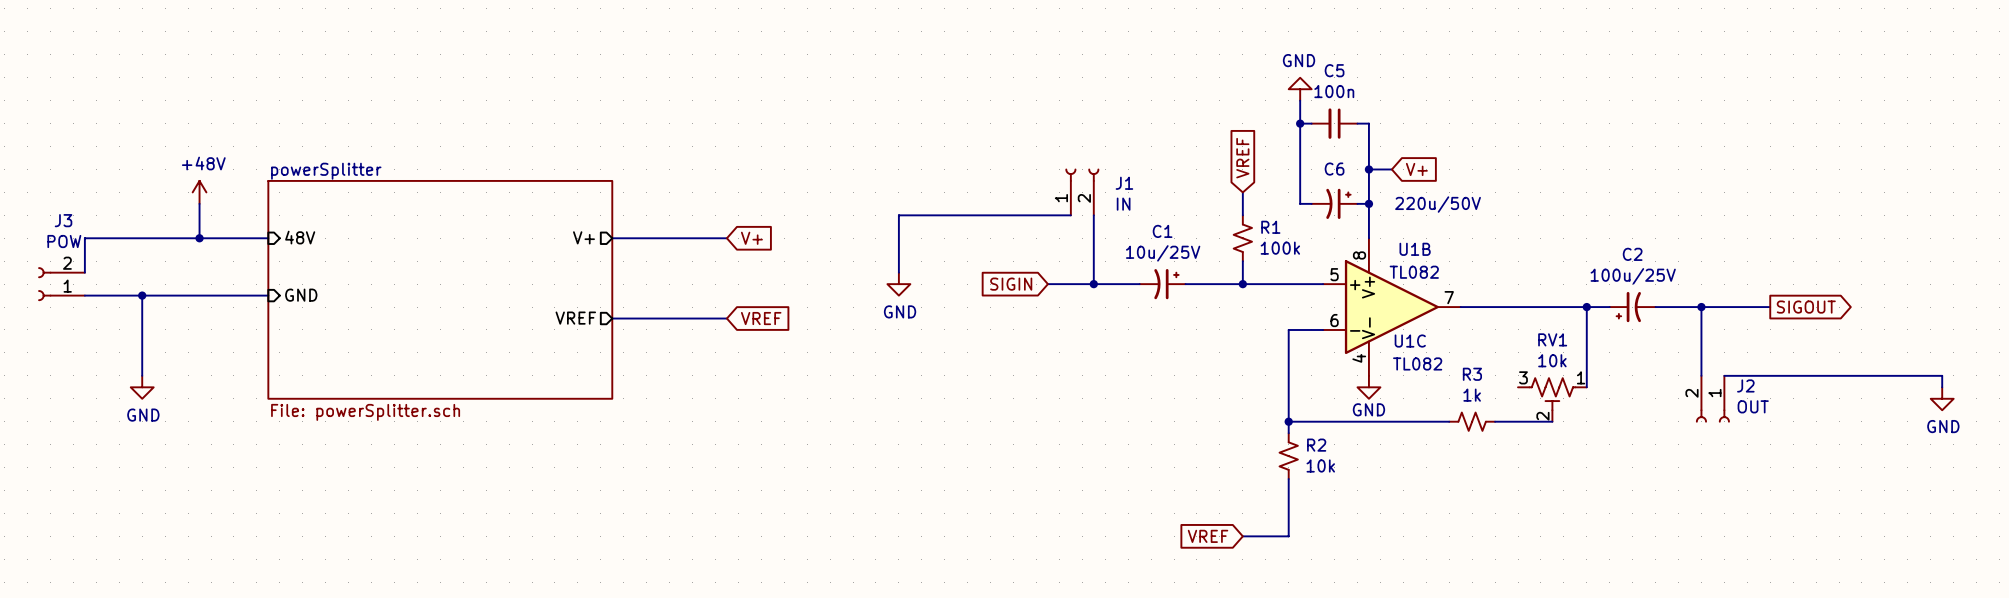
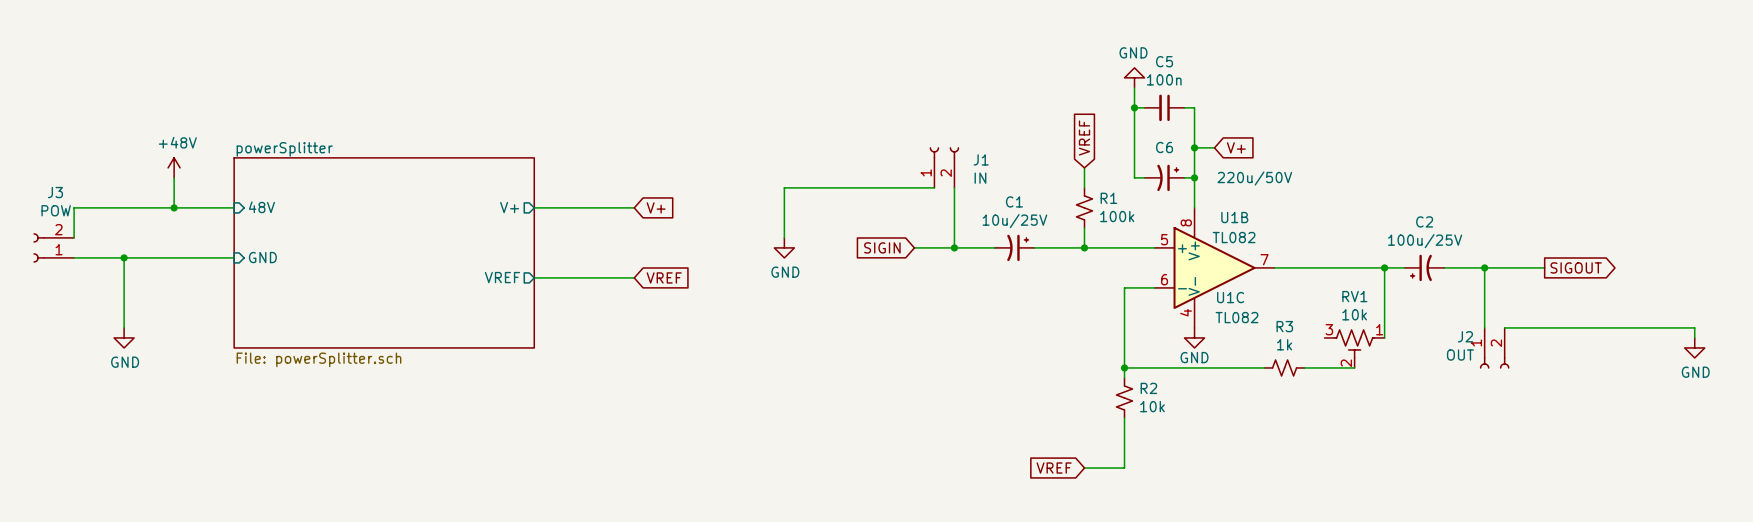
J2 flip: as is (1712, 415) -> left-right (1494, 362)

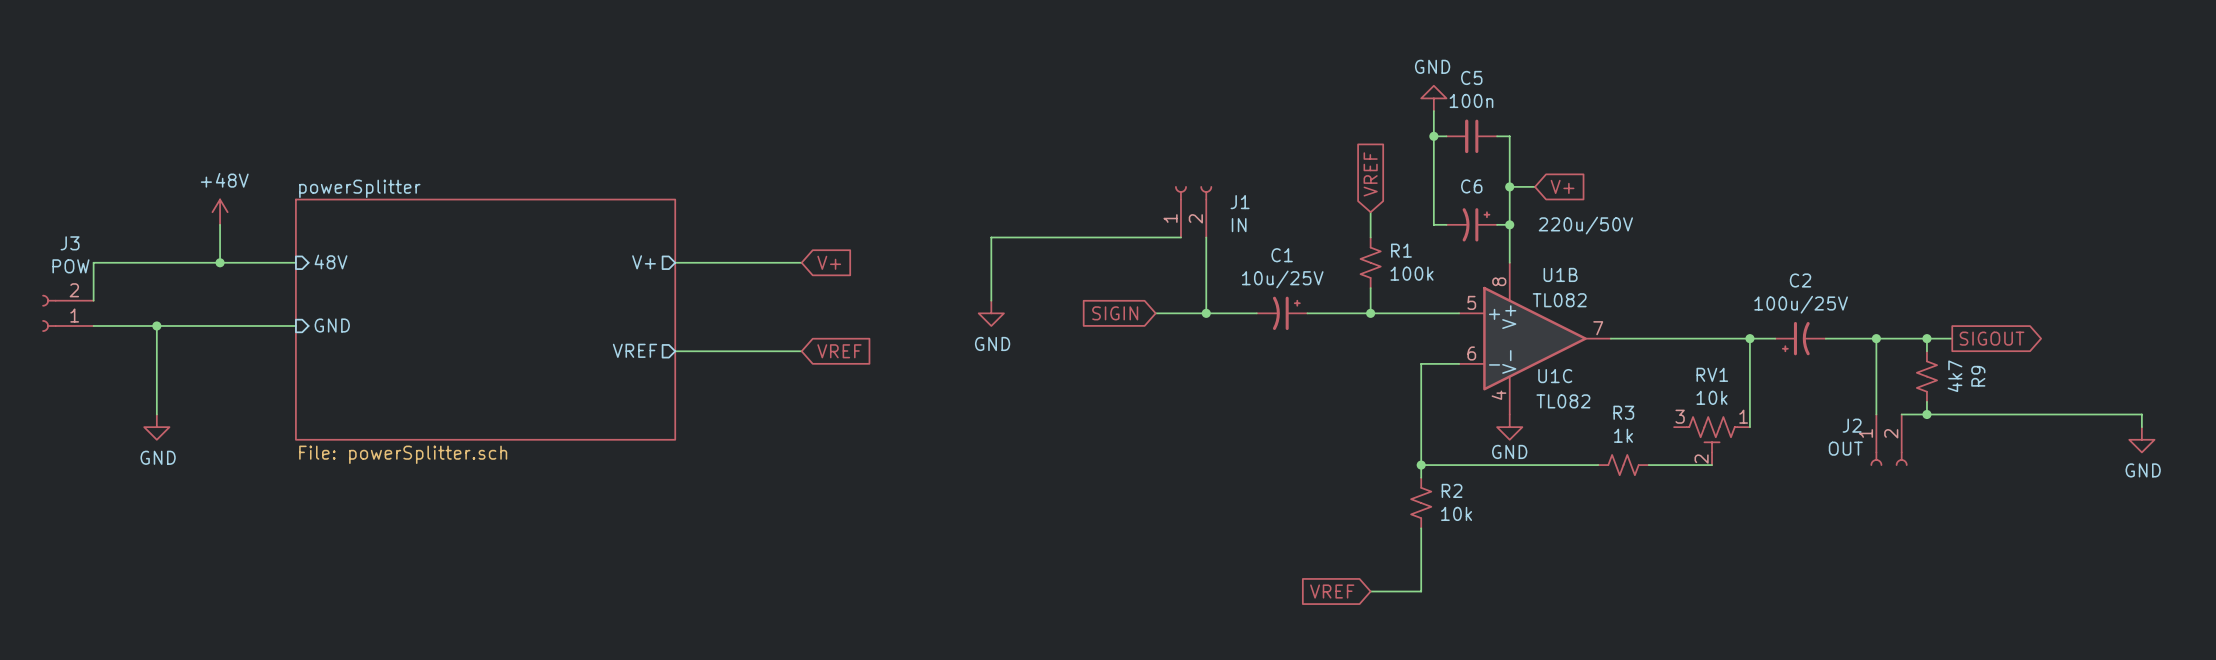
wire: none -> (1926, 338) (1926, 351)
junction: none -> (1926, 338)
R9: none -> 4k7 (1926, 376)
wire: none -> (1926, 401) (1926, 414)
junction: none -> (1926, 414)

